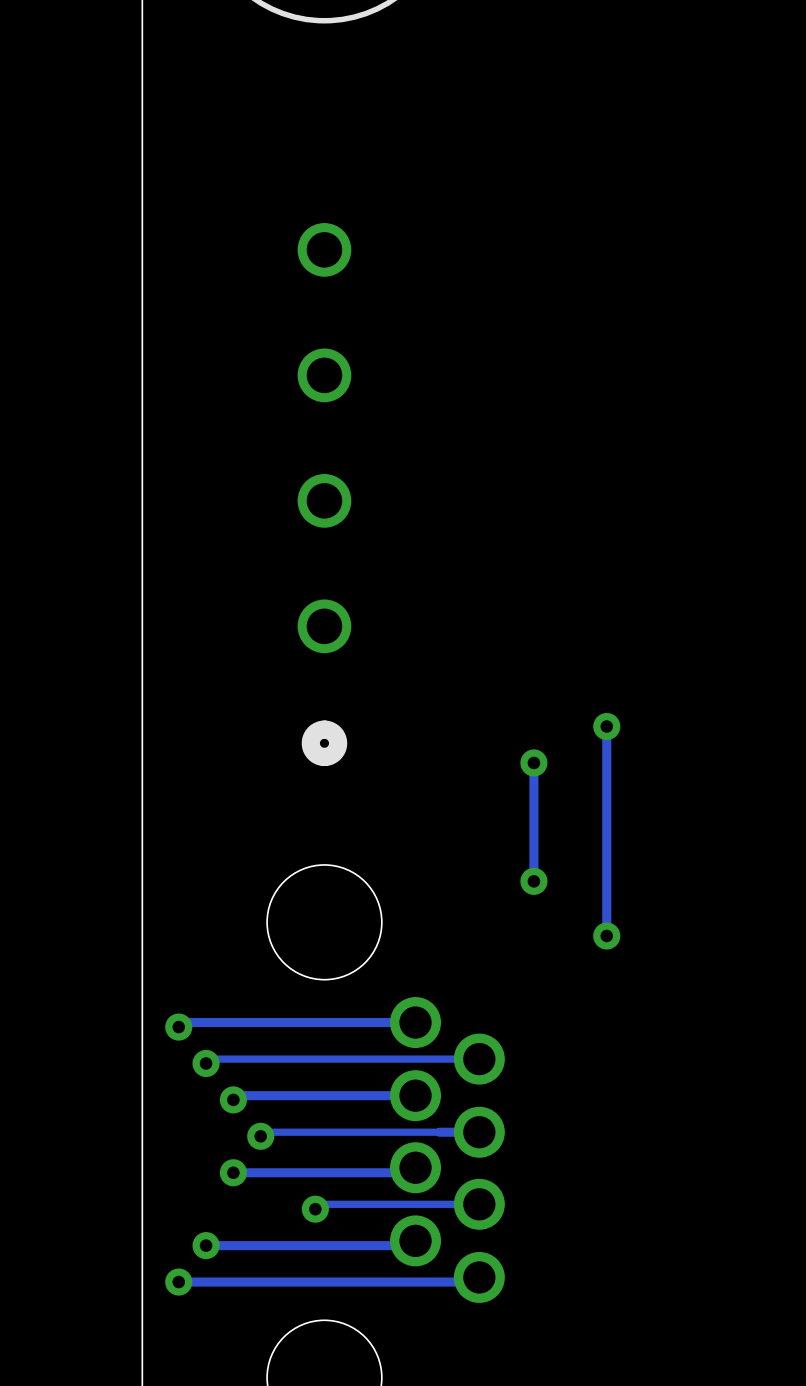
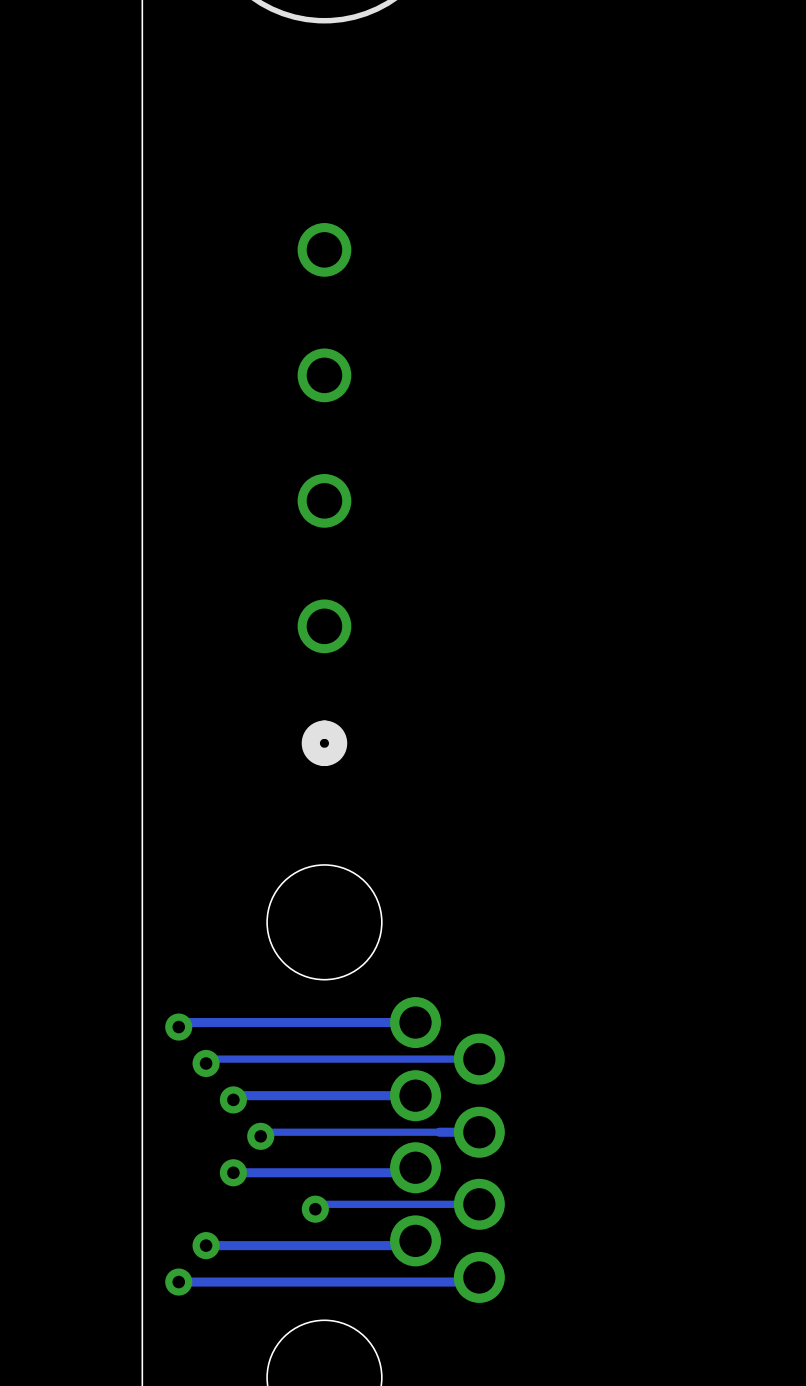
track: (606, 726) (606, 935) -> none
via: (606, 726) -> none
track: (533, 762) (533, 881) -> none
via: (533, 762) -> none
via: (533, 881) -> none
via: (606, 935) -> none

